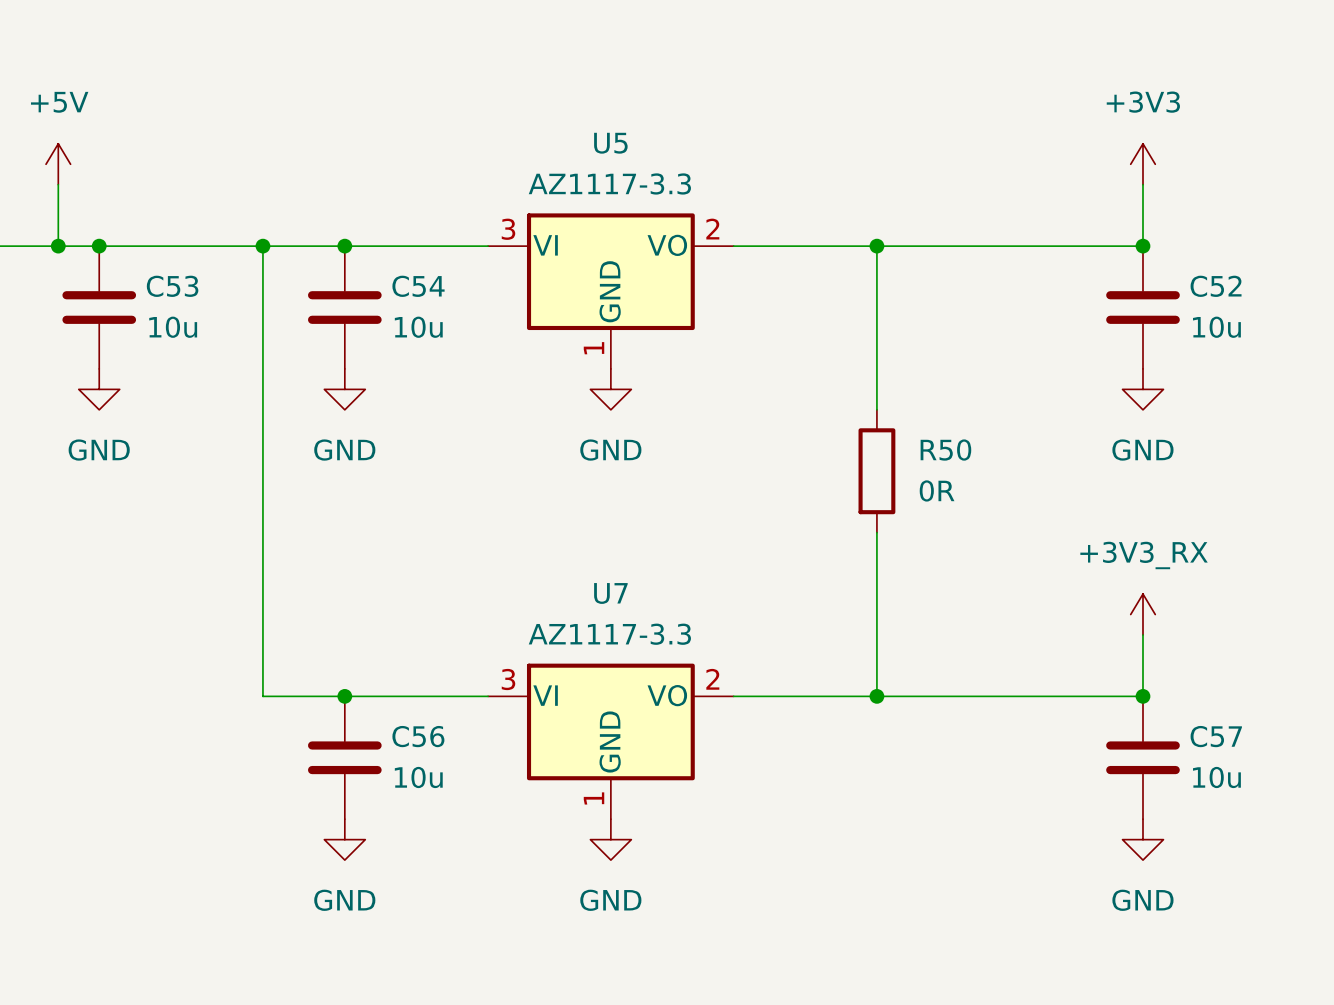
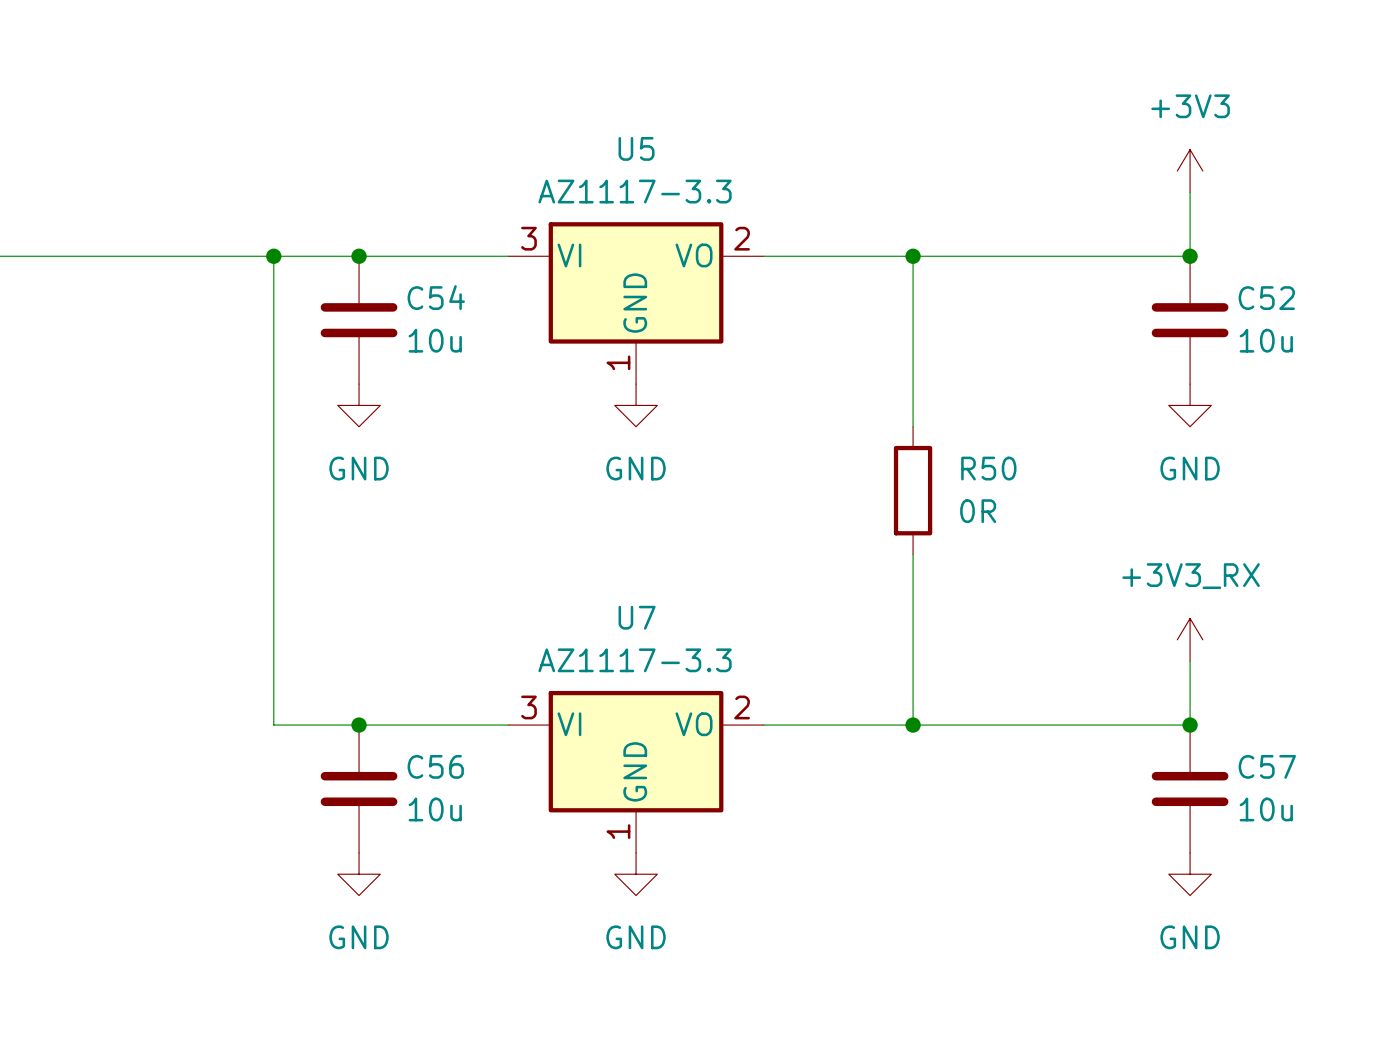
power symbol: +5V (58, 164) -> none
wire: (58, 184) (58, 246) -> none
junction: (58, 246) -> none
junction: (99, 246) -> none
C53: 10u (99, 307) -> none
power symbol: GND (99, 389) -> none

